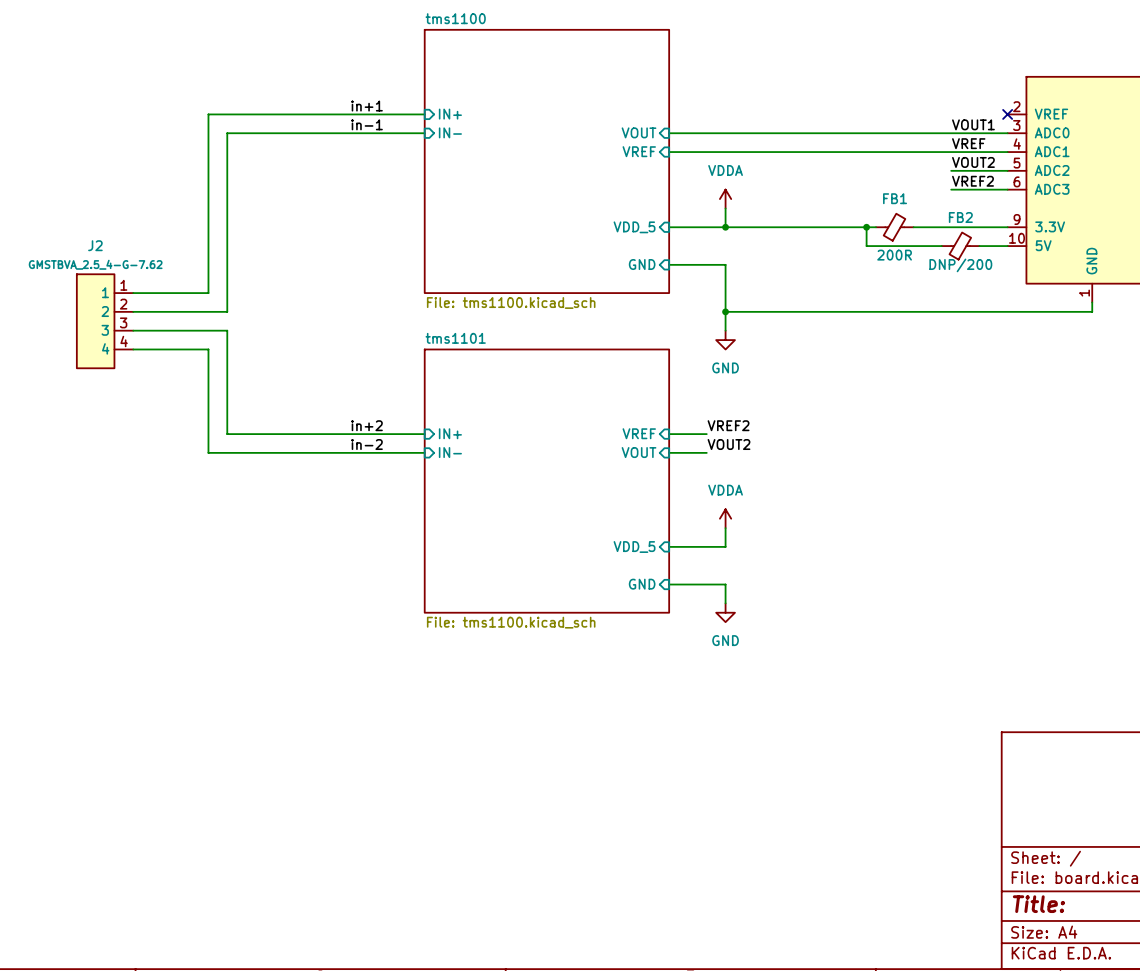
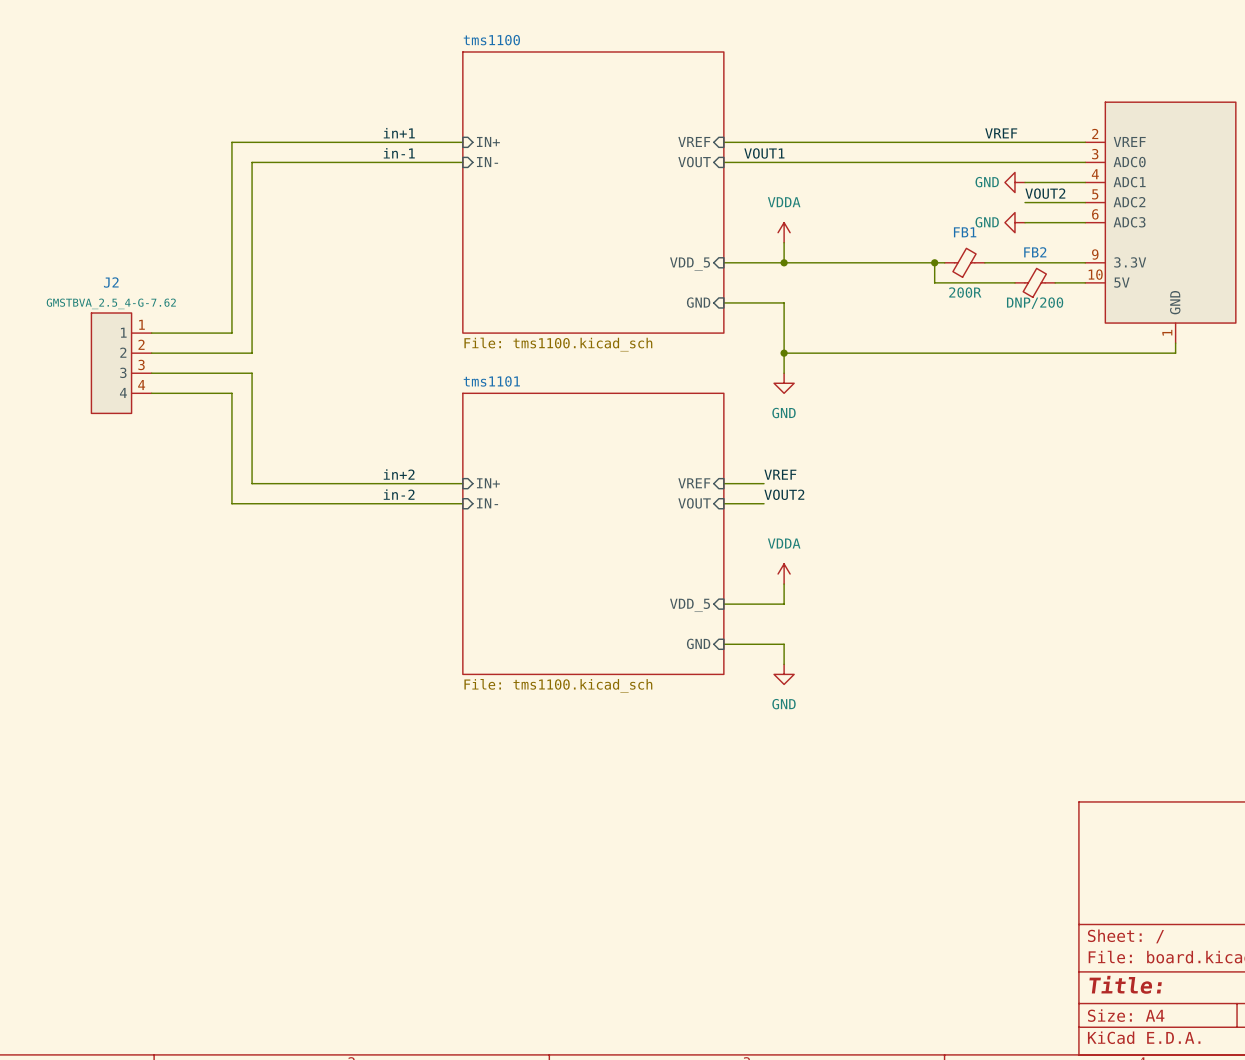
wire: none -> (723, 142) (1085, 142)
no-connect mark: (1007, 114) -> none
label: none -> VOUT1 (764, 153)
label: VOUT1 (973, 124) -> none
label position: VREF (968, 143) -> VREF (1001, 133)
sheet pin position: VREF (639, 151) -> VREF (694, 141)
wire: (669, 152) (951, 152) -> none
power symbol: none -> GND (1014, 182)
label: VREF2 (972, 181) -> none
power symbol: none -> GND (1014, 222)
label: VREF2 (728, 425) -> VREF (780, 474)

